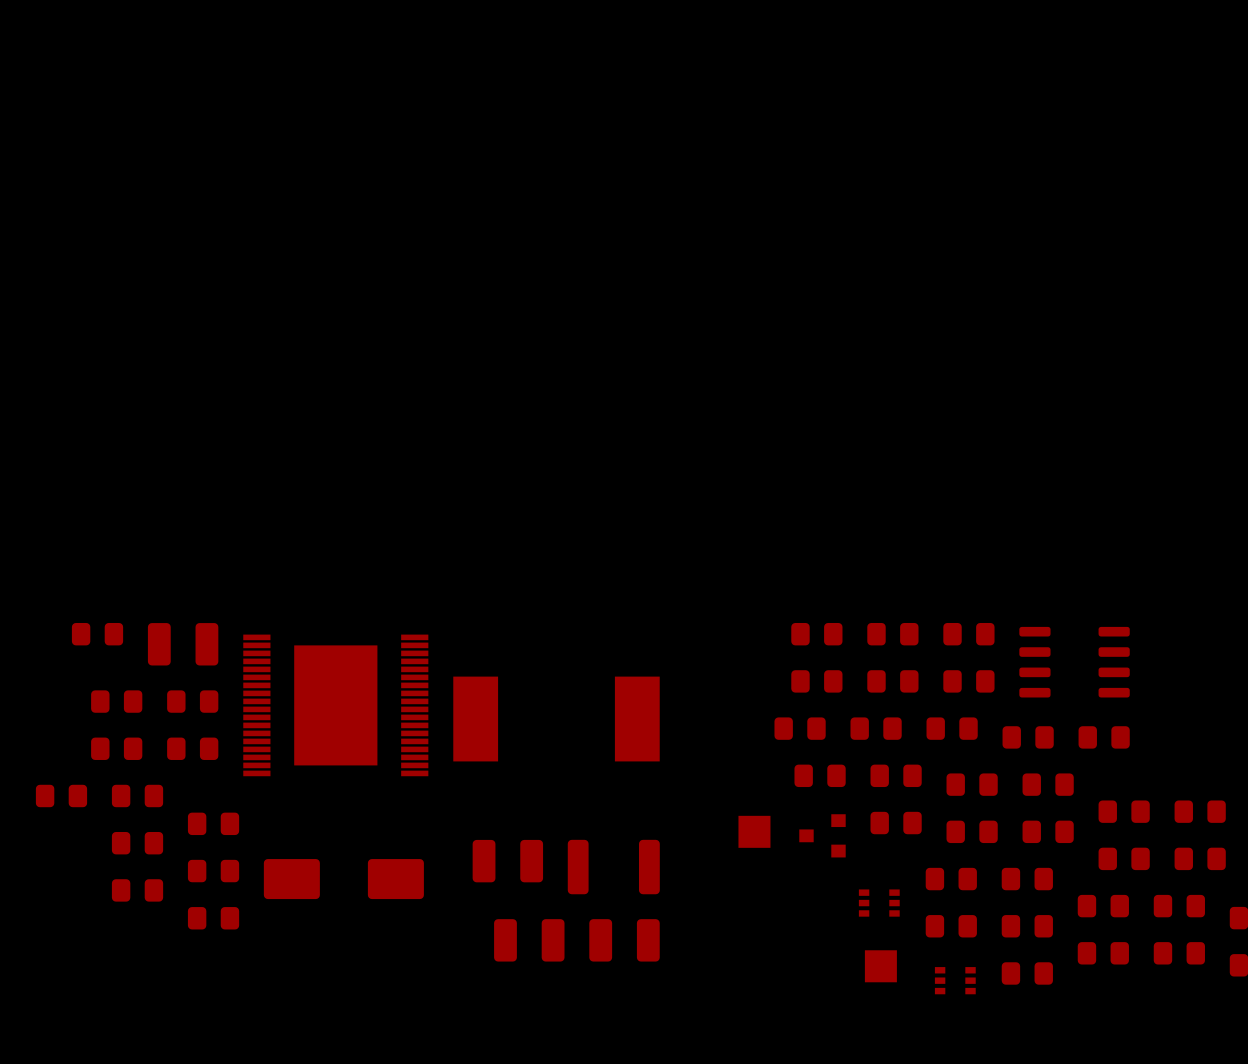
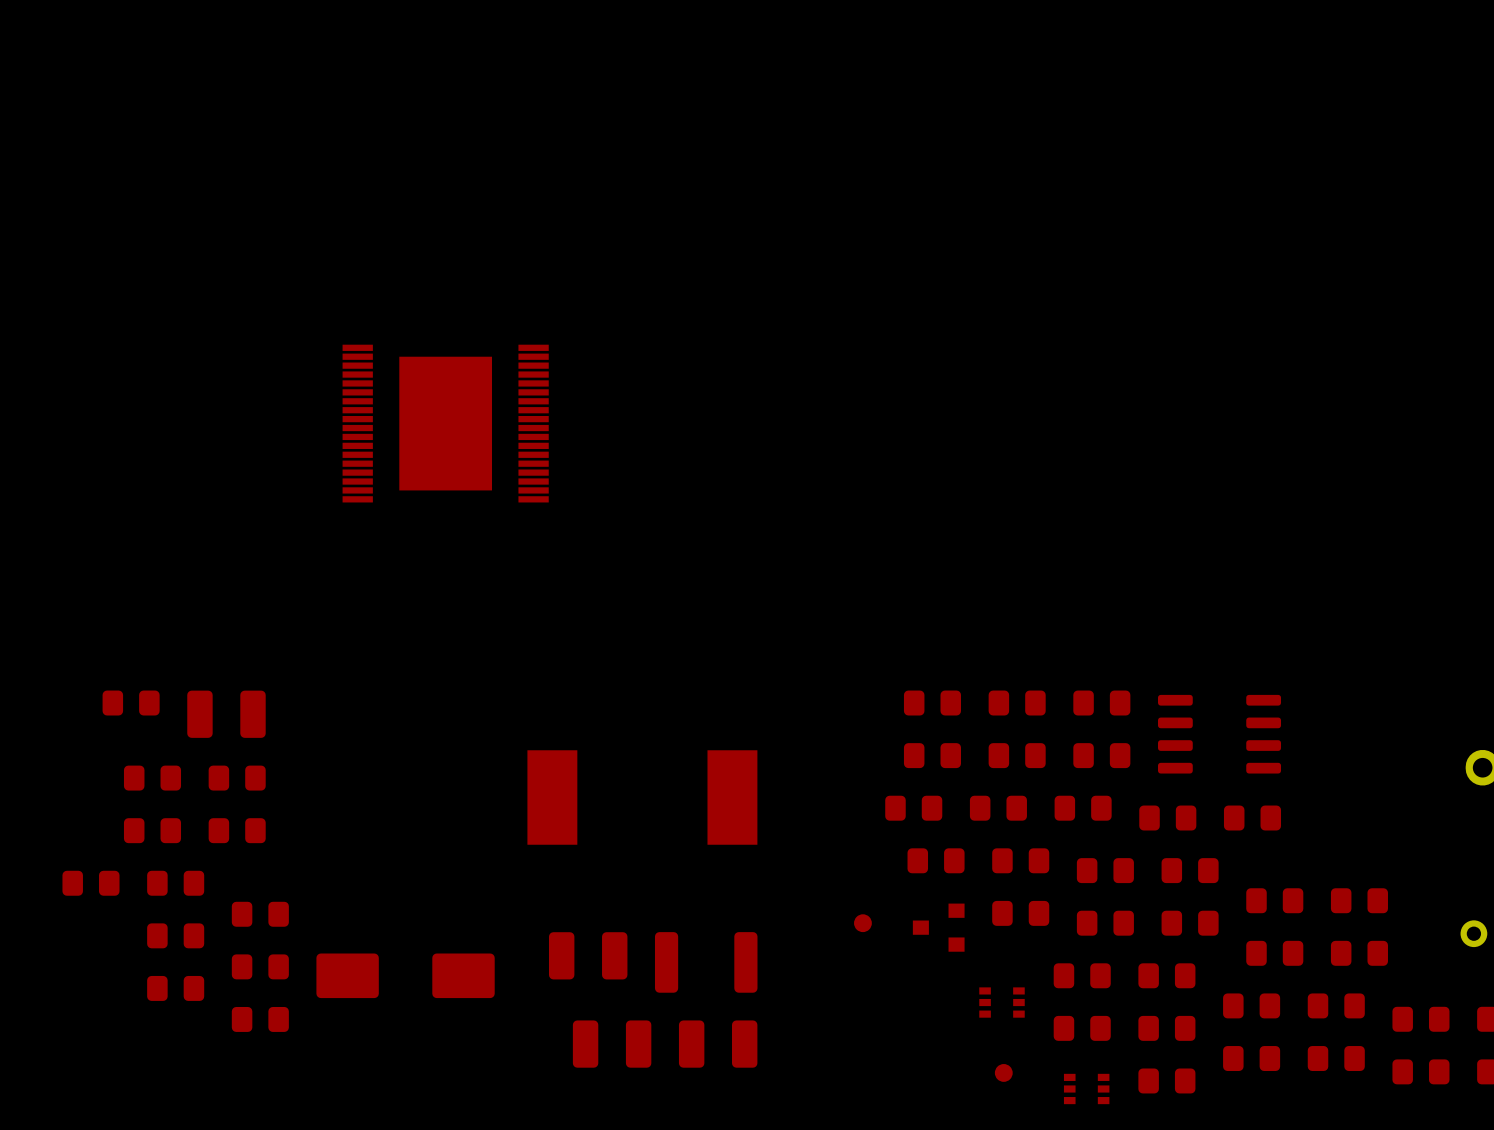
part position: (335, 705) -> (445, 423)
part footprint: [738, 815, 771, 848] -> [854, 914, 872, 933]
part footprint: [864, 950, 897, 983] -> [994, 1064, 1013, 1082]

